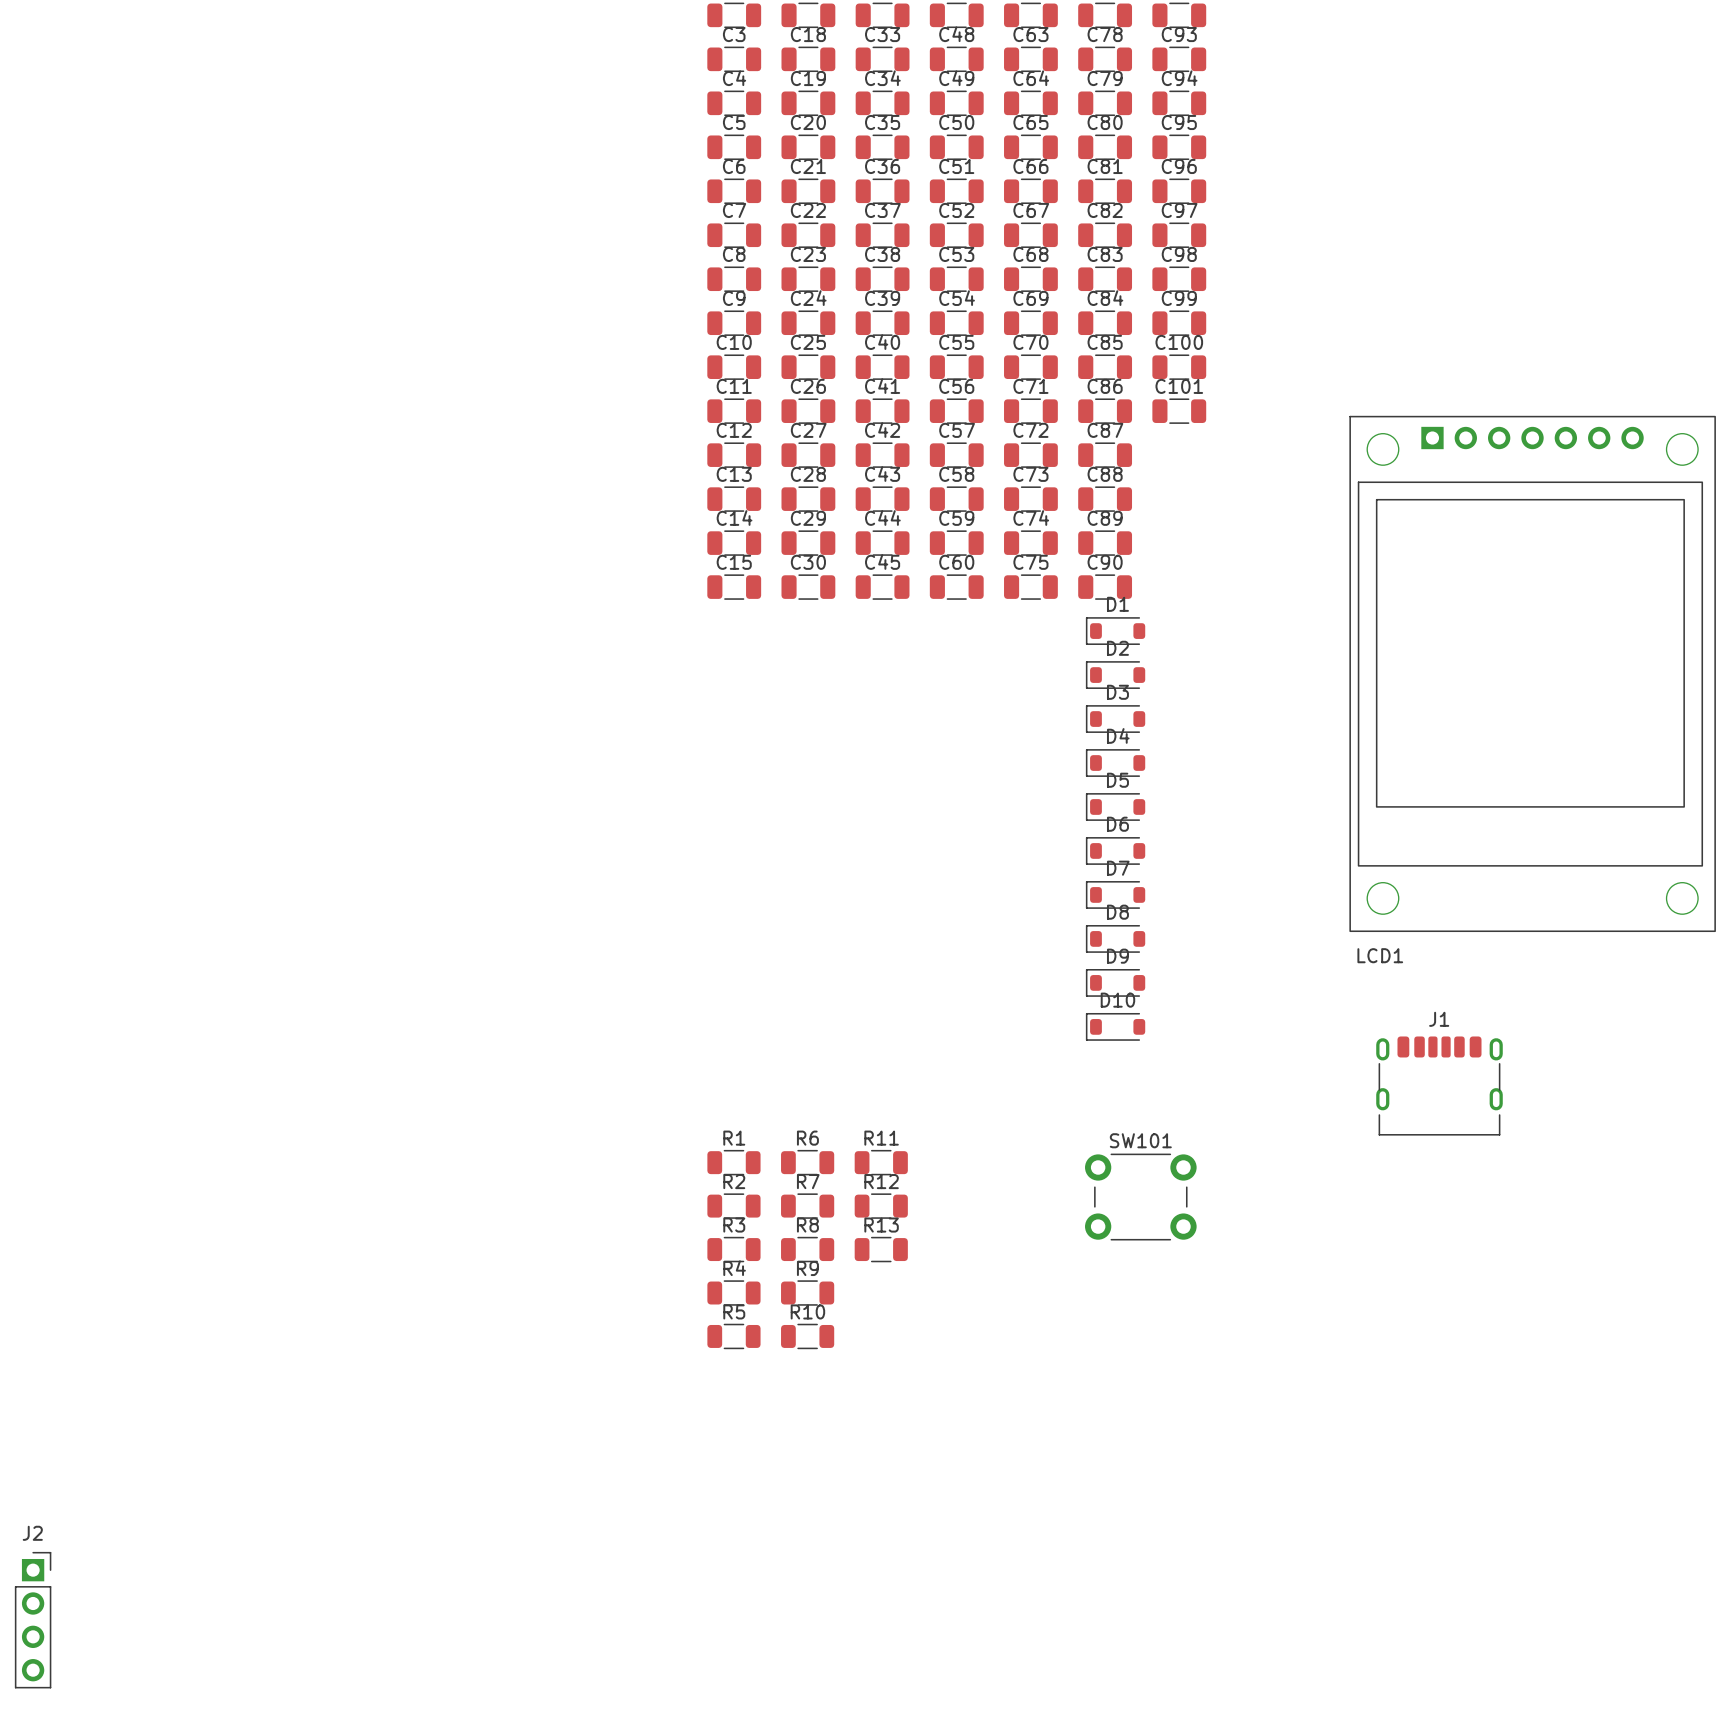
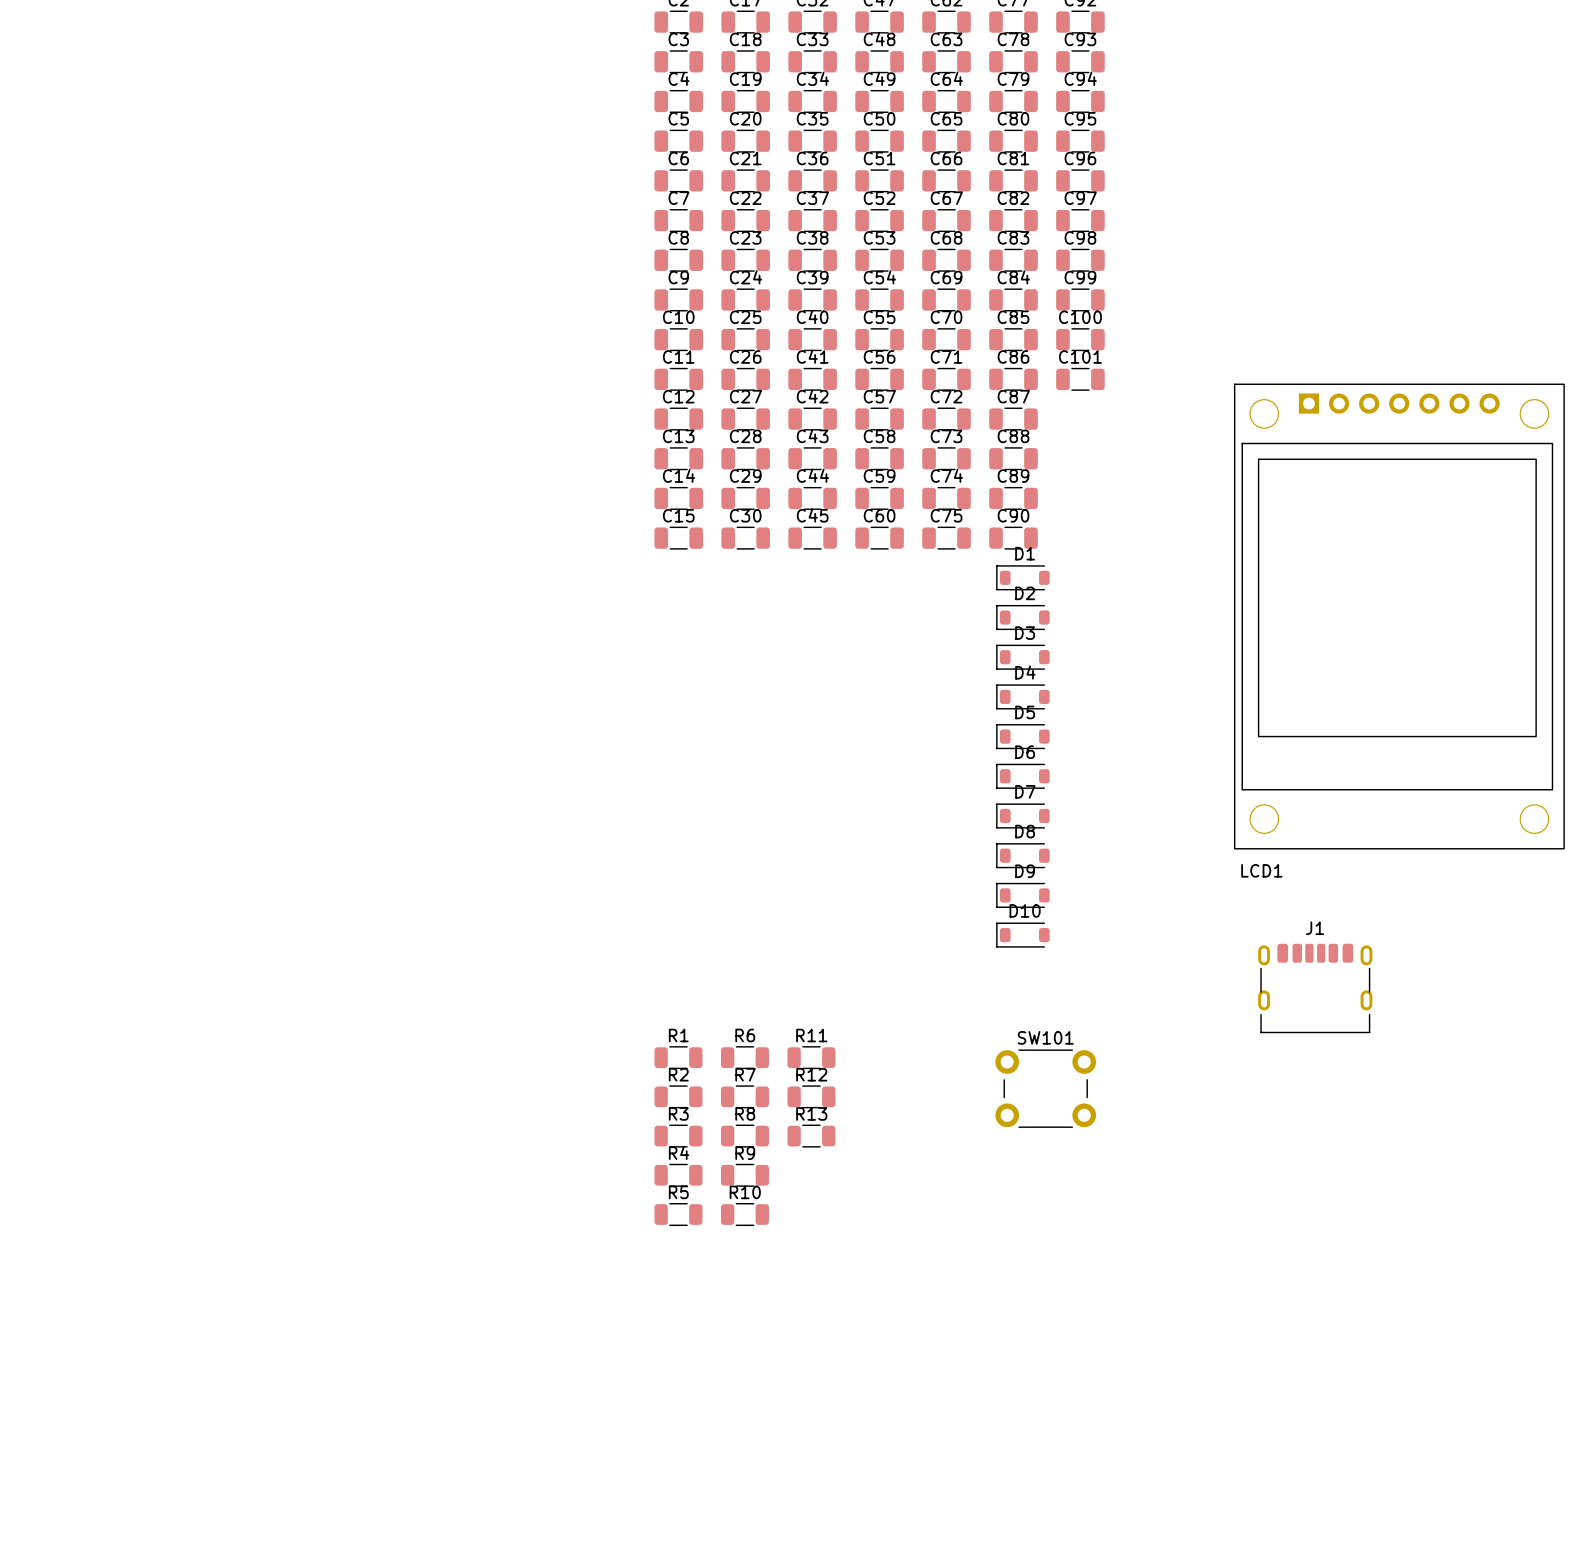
J2: (33, 1620) -> none

